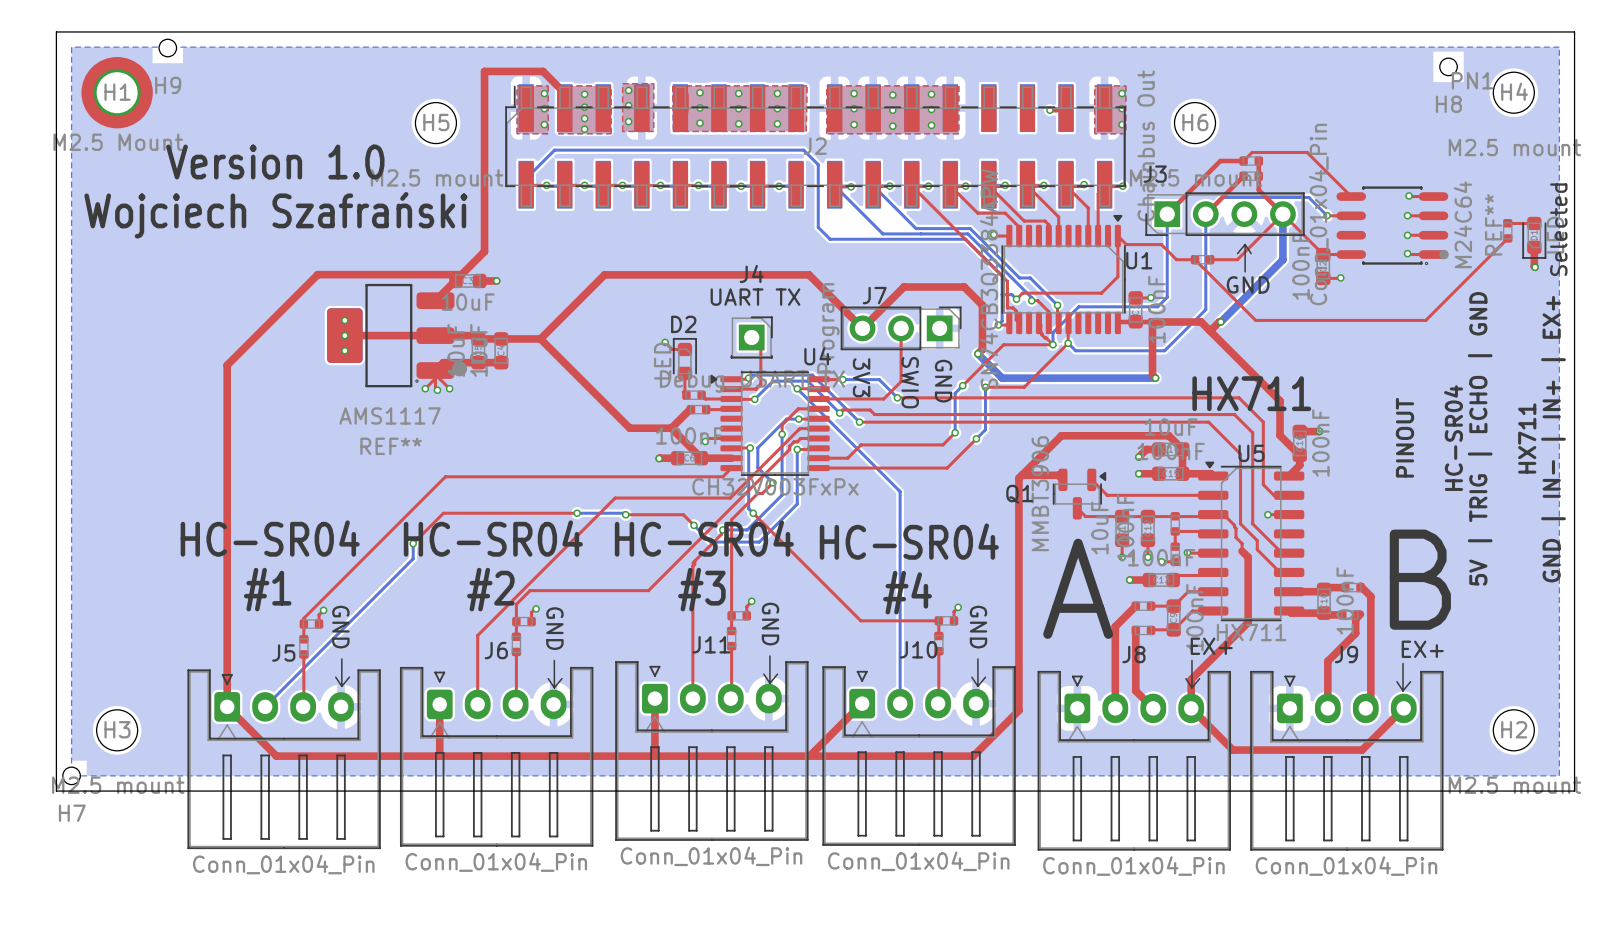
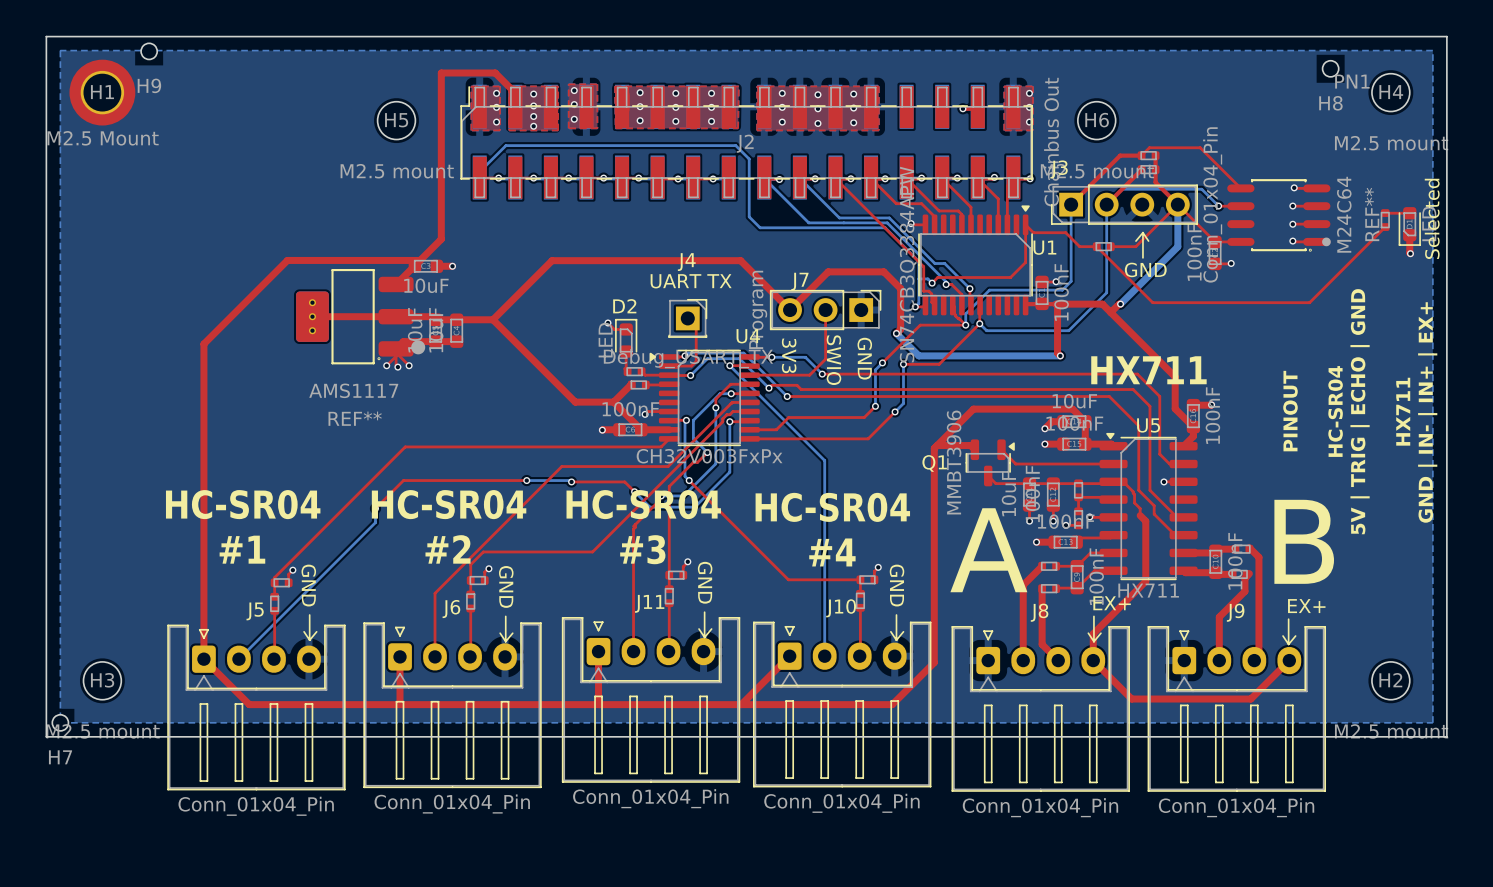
text: Version 1.0 (275, 162) -> none
text: Wojciech Szafrański (275, 215) -> none

